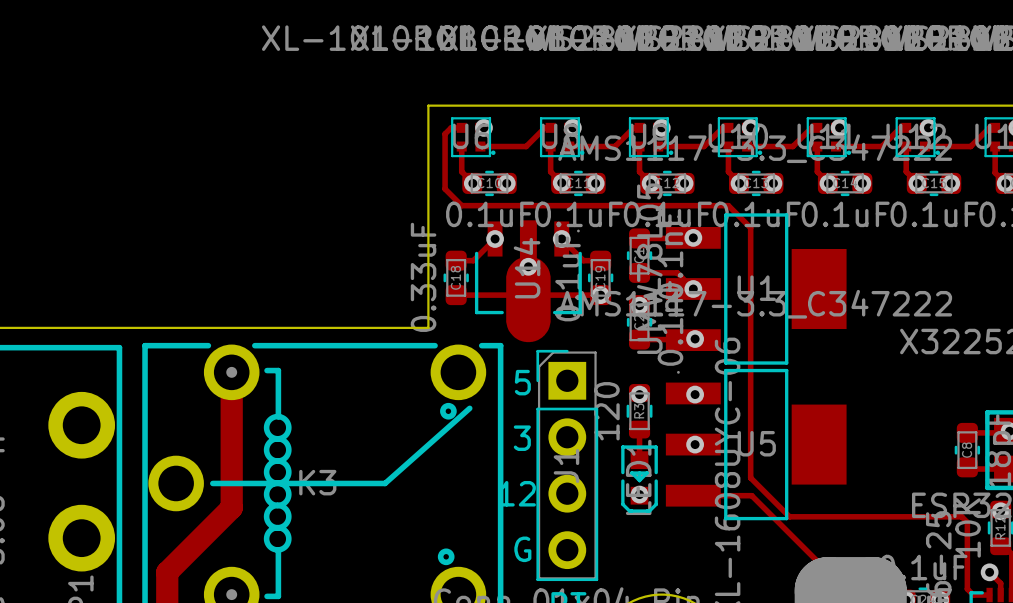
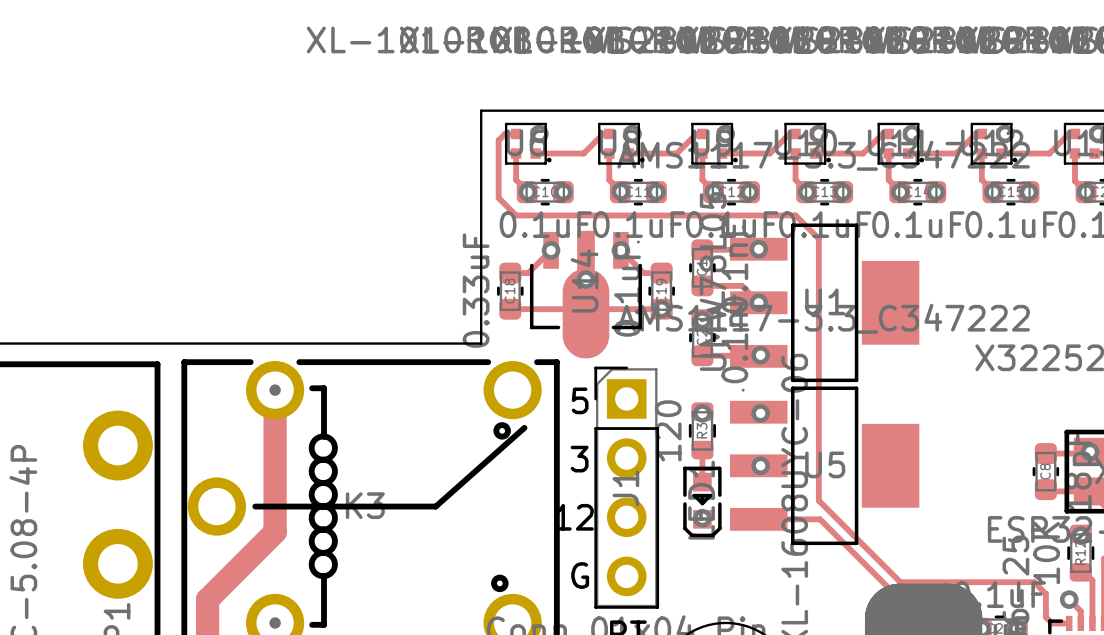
track: (789, 516) (961, 516) (967, 522) (967, 566) -> (859, 541) (900, 582) (1034, 582) (1045, 593)

